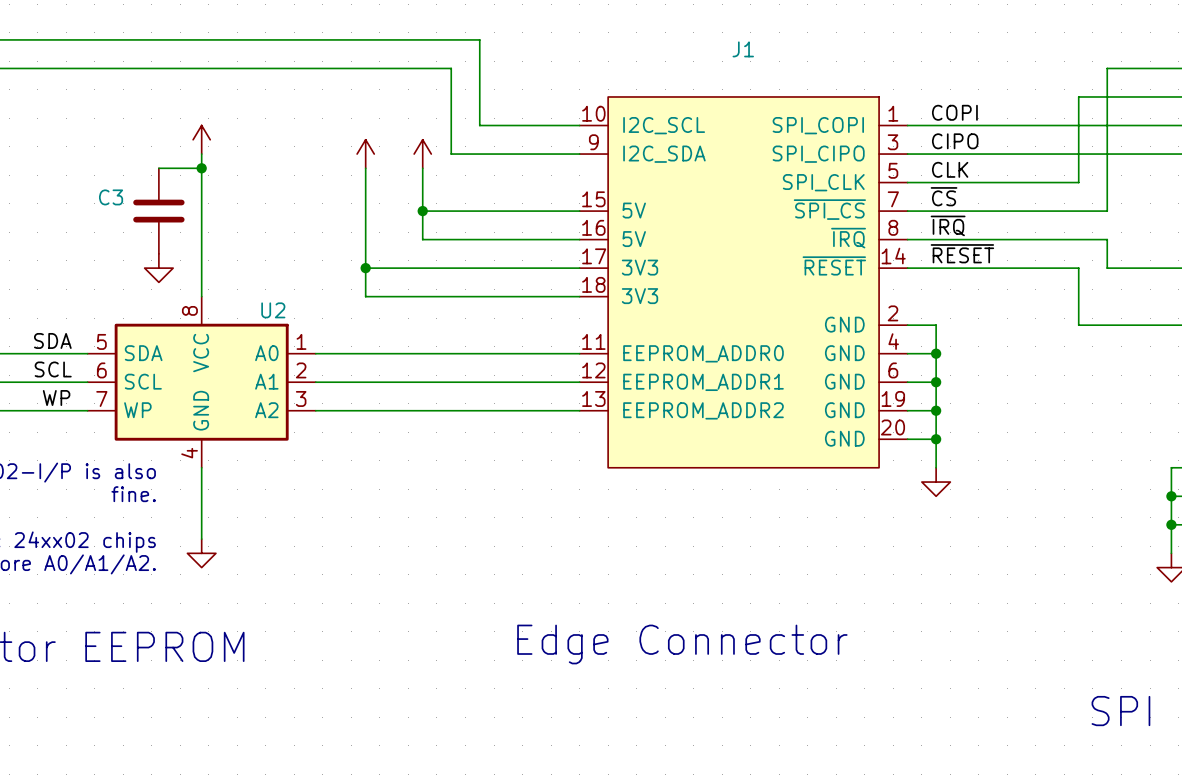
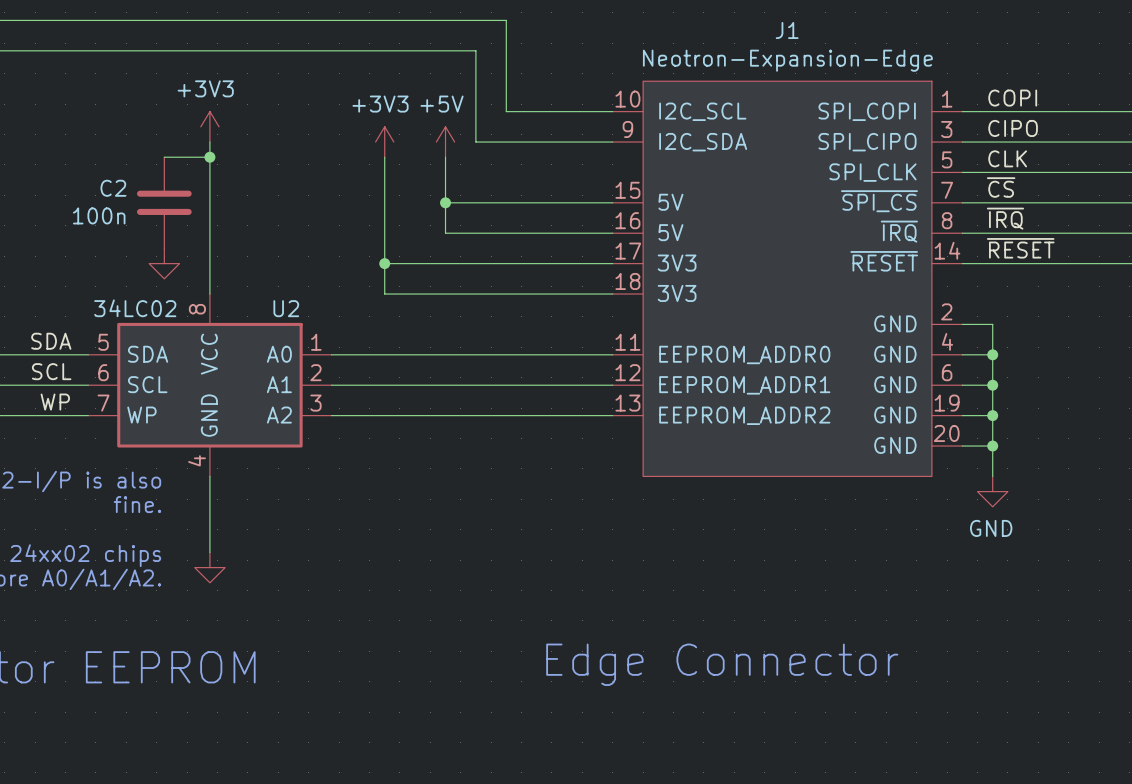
J1 value: none -> Neotron-Expansion-Edge (787, 60)
power symbol text: none -> +3V3 (205, 88)
power symbol text: none -> +3V3 (380, 104)
power symbol text: none -> +5V (442, 104)
C3 name: C3 (111, 197) -> C2 (113, 188)
C3 value: none -> 100n (99, 215)
U2 value: none -> 34LC02 (135, 308)
power symbol text: none -> GND (991, 528)

